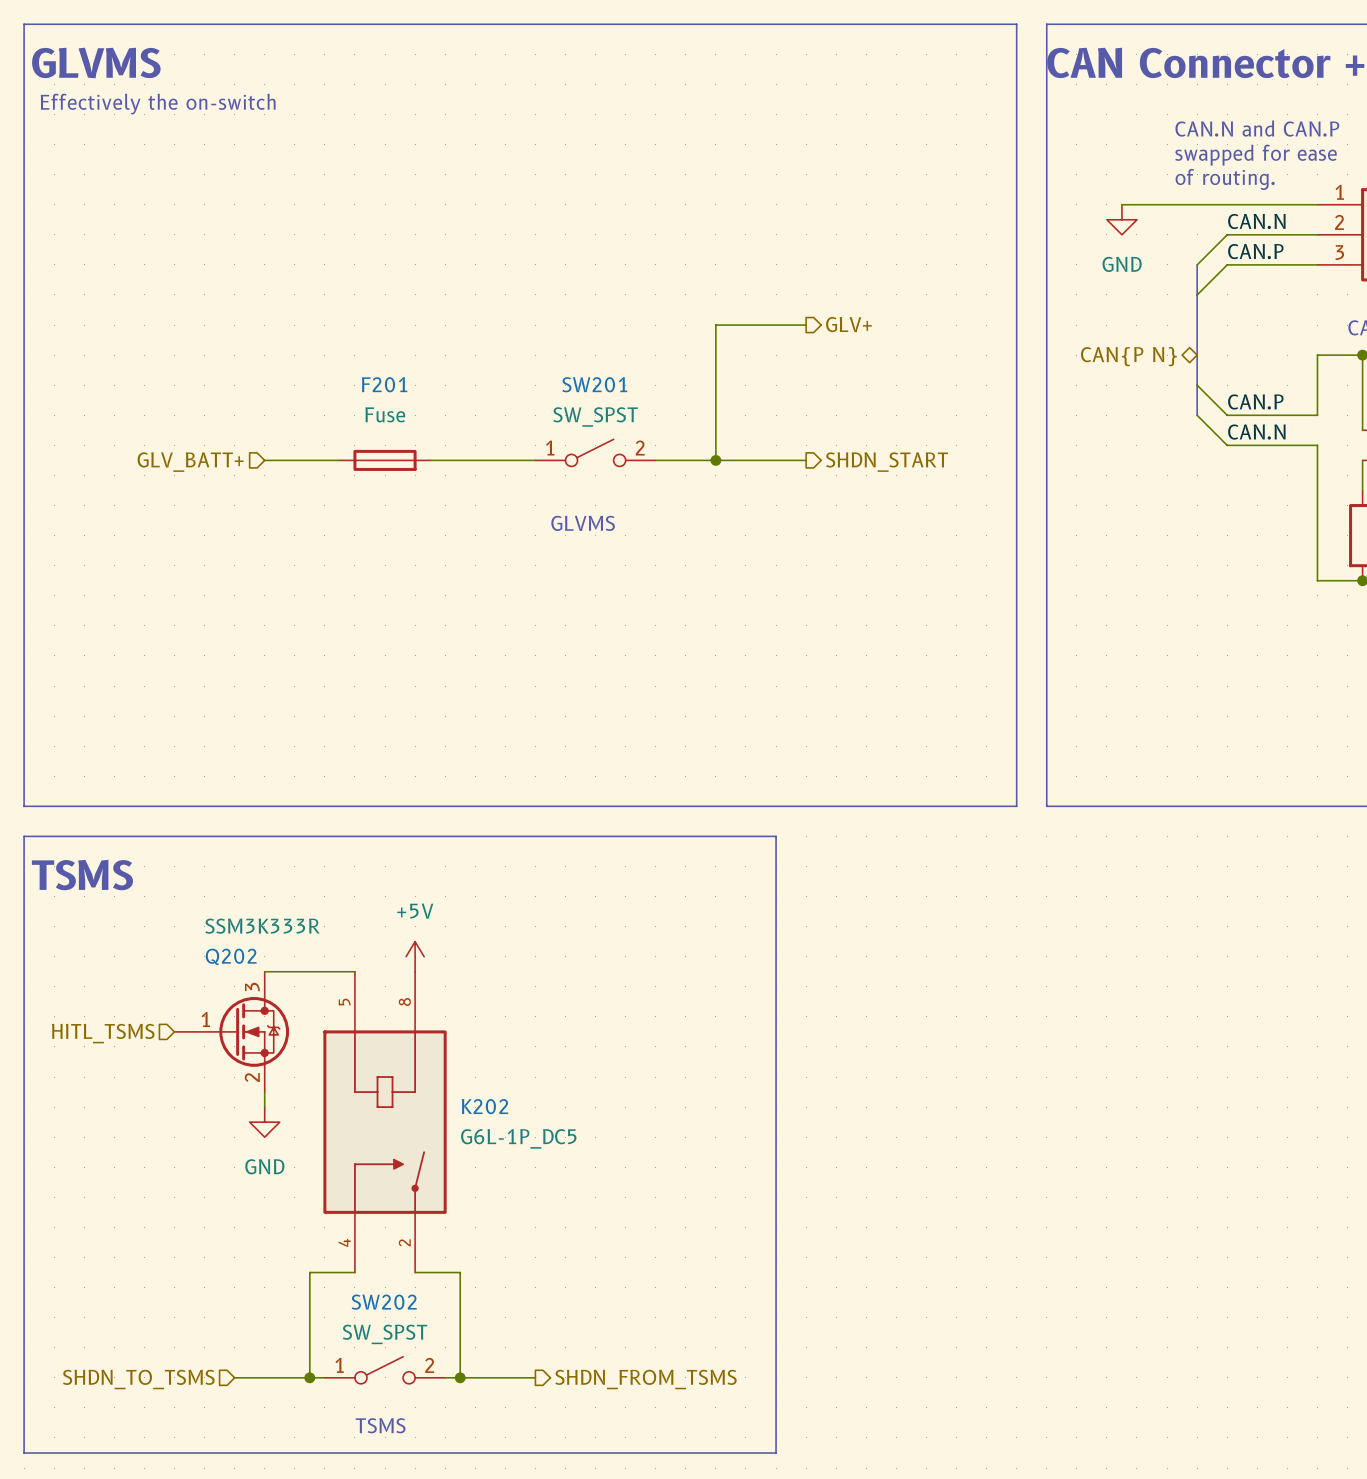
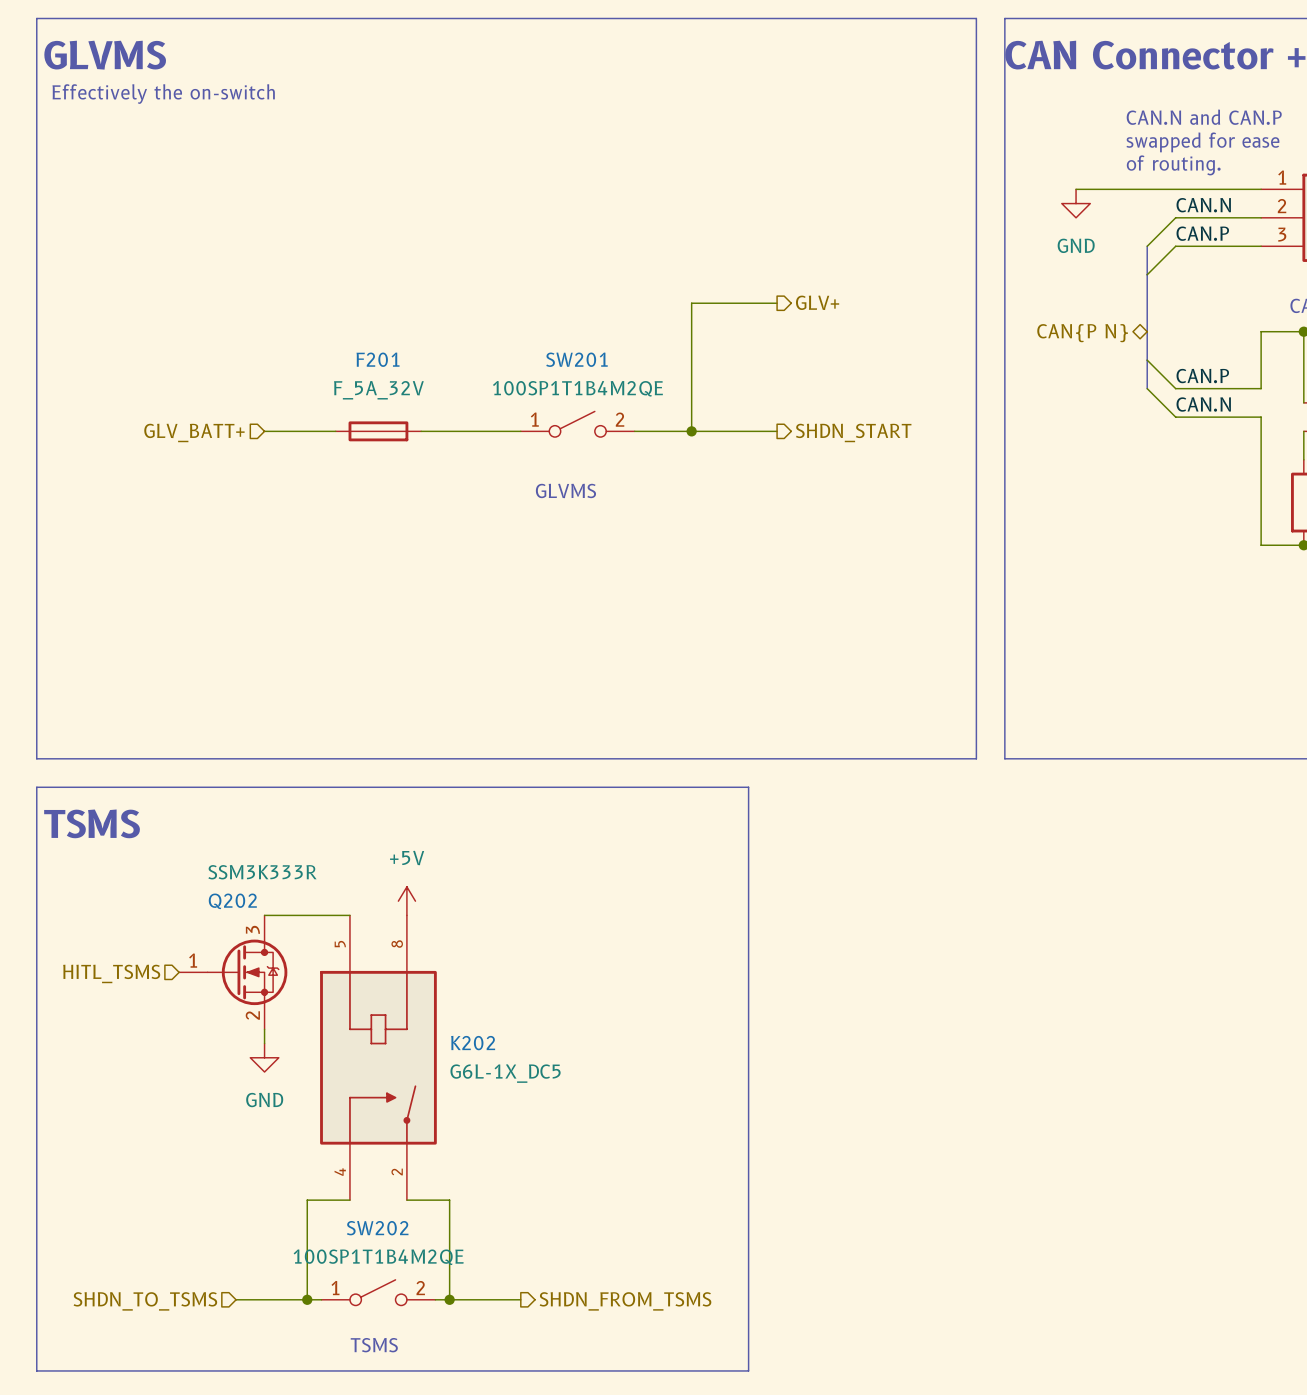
F201 value: Fuse (385, 414) -> F_5A_32V (378, 390)
SW201 value: SW_SPST (595, 416) -> 100SP1T1B4M2QE (577, 388)
Q202 symbol: [174, 971, 290, 1093] -> [179, 915, 288, 1030]
K202 value: G6L-1P_DC5 (518, 1138) -> G6L-1X_DC5 (505, 1073)
SW202 value: SW_SPST (385, 1334) -> 100SP1T1B4M2QE (378, 1257)

